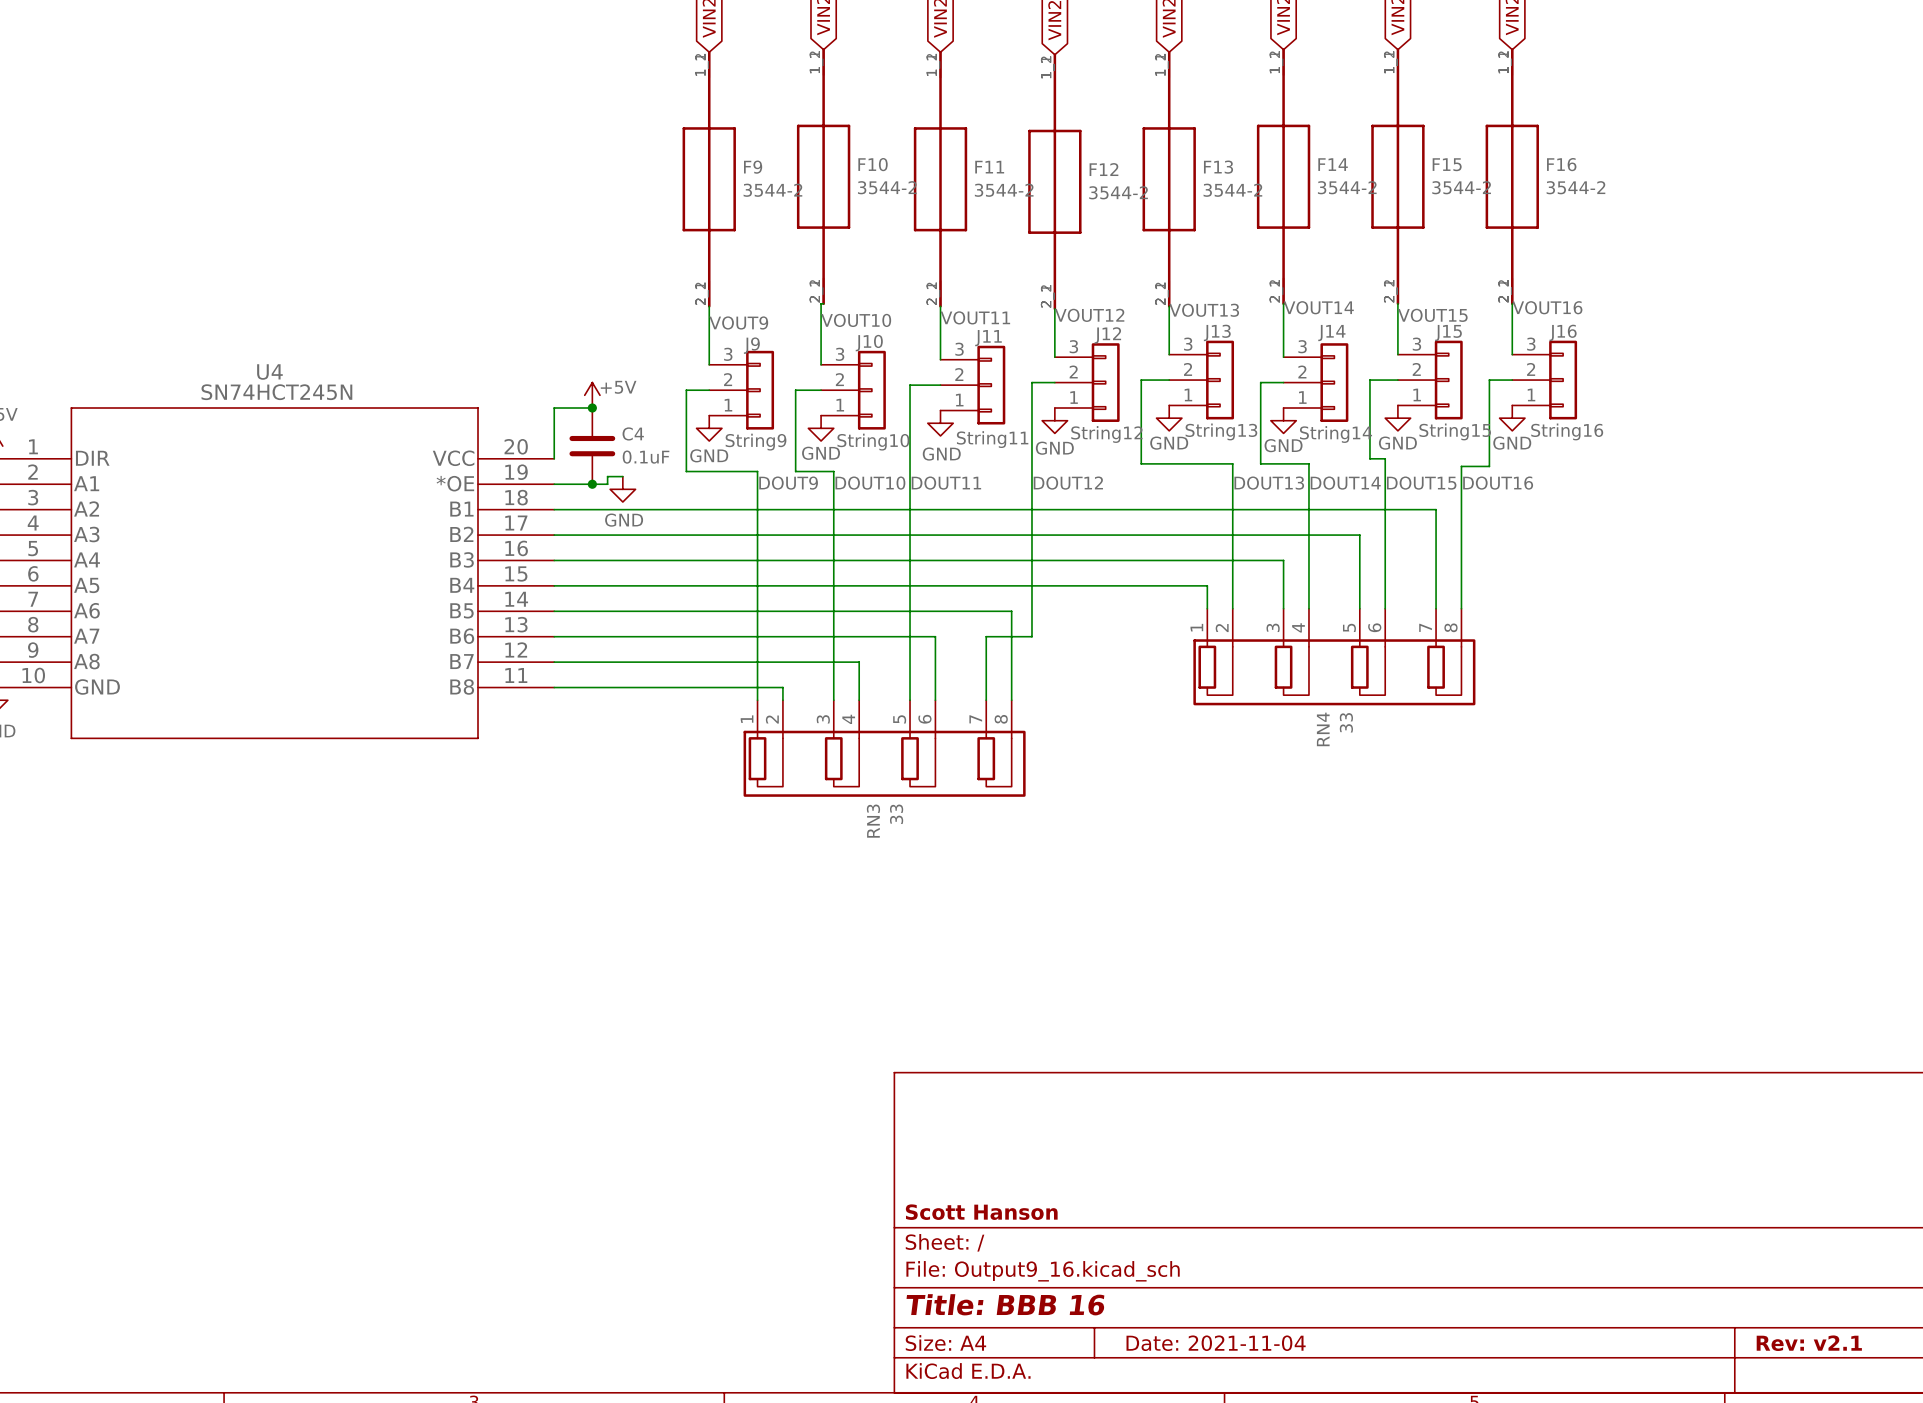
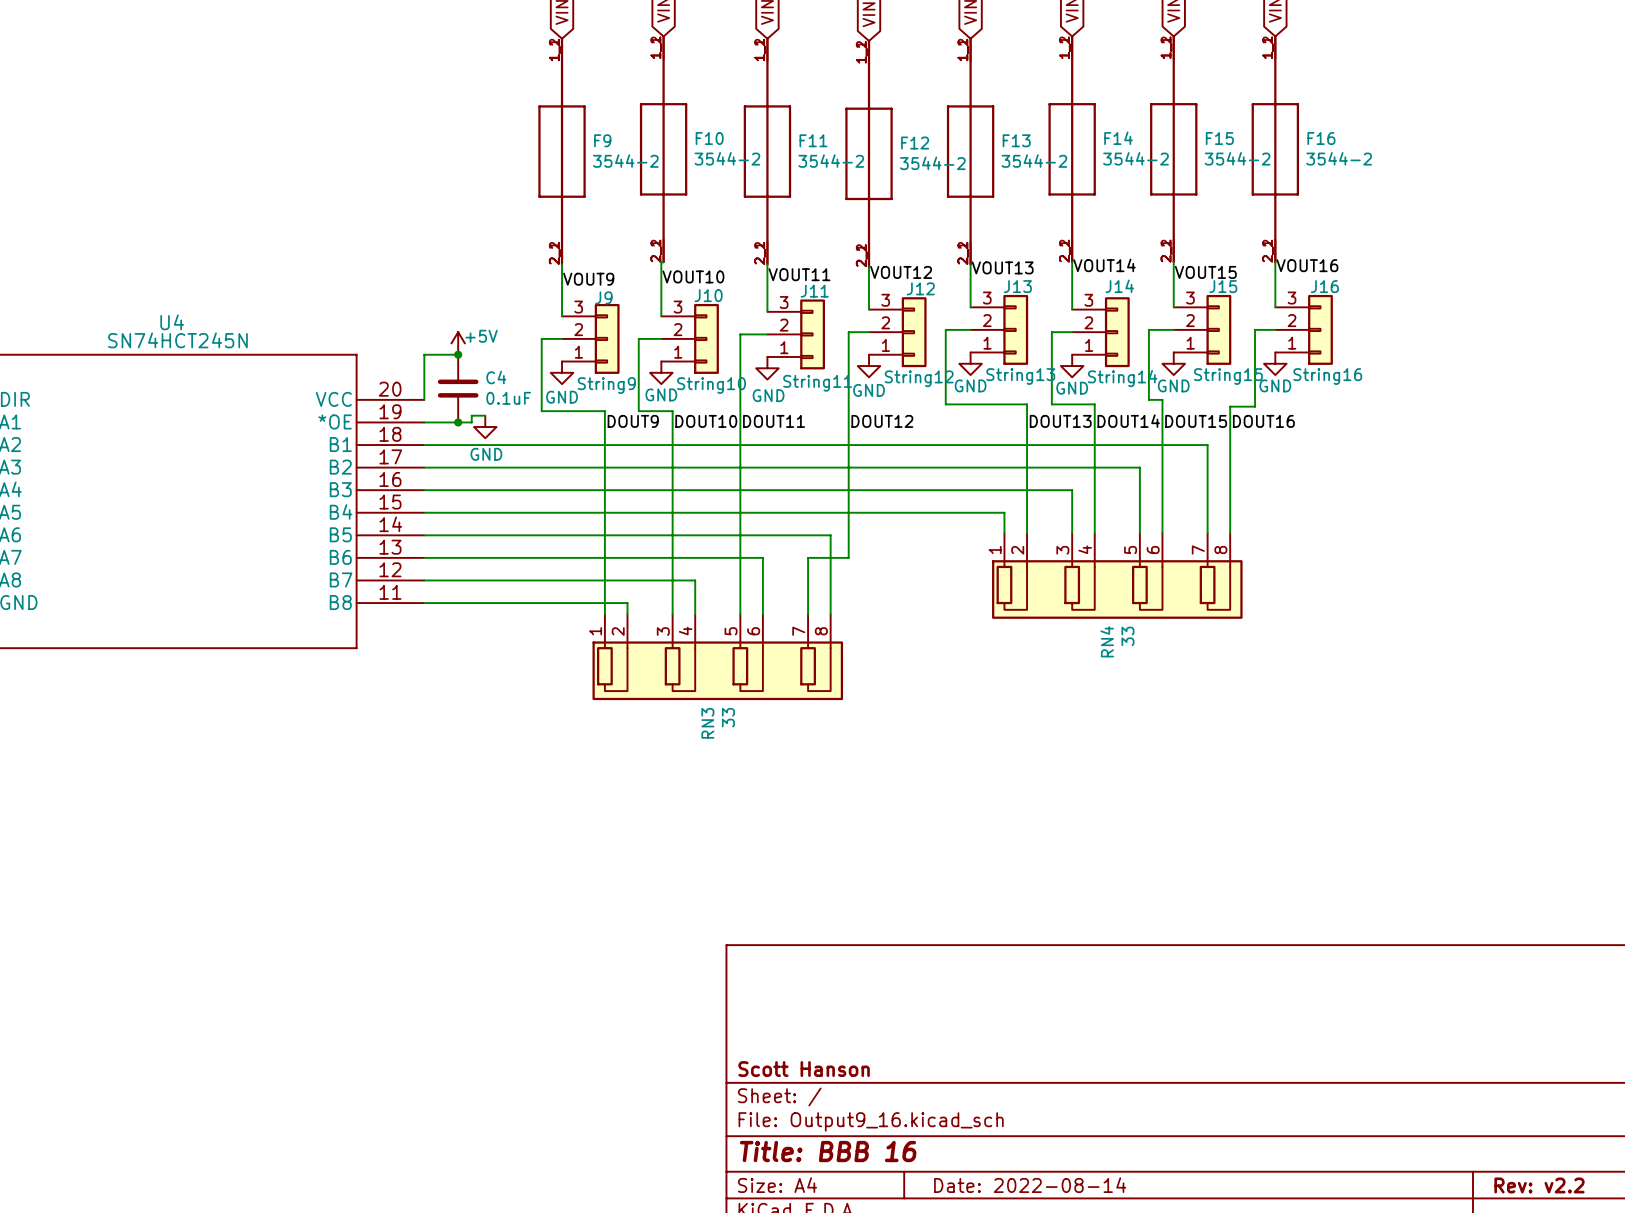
title block: Date: 2021-11-04 (1216, 1343) -> Date: 2022-08-14 (1030, 1185)
title block: Rev: v2.1 (1809, 1343) -> Rev: v2.2 (1539, 1185)

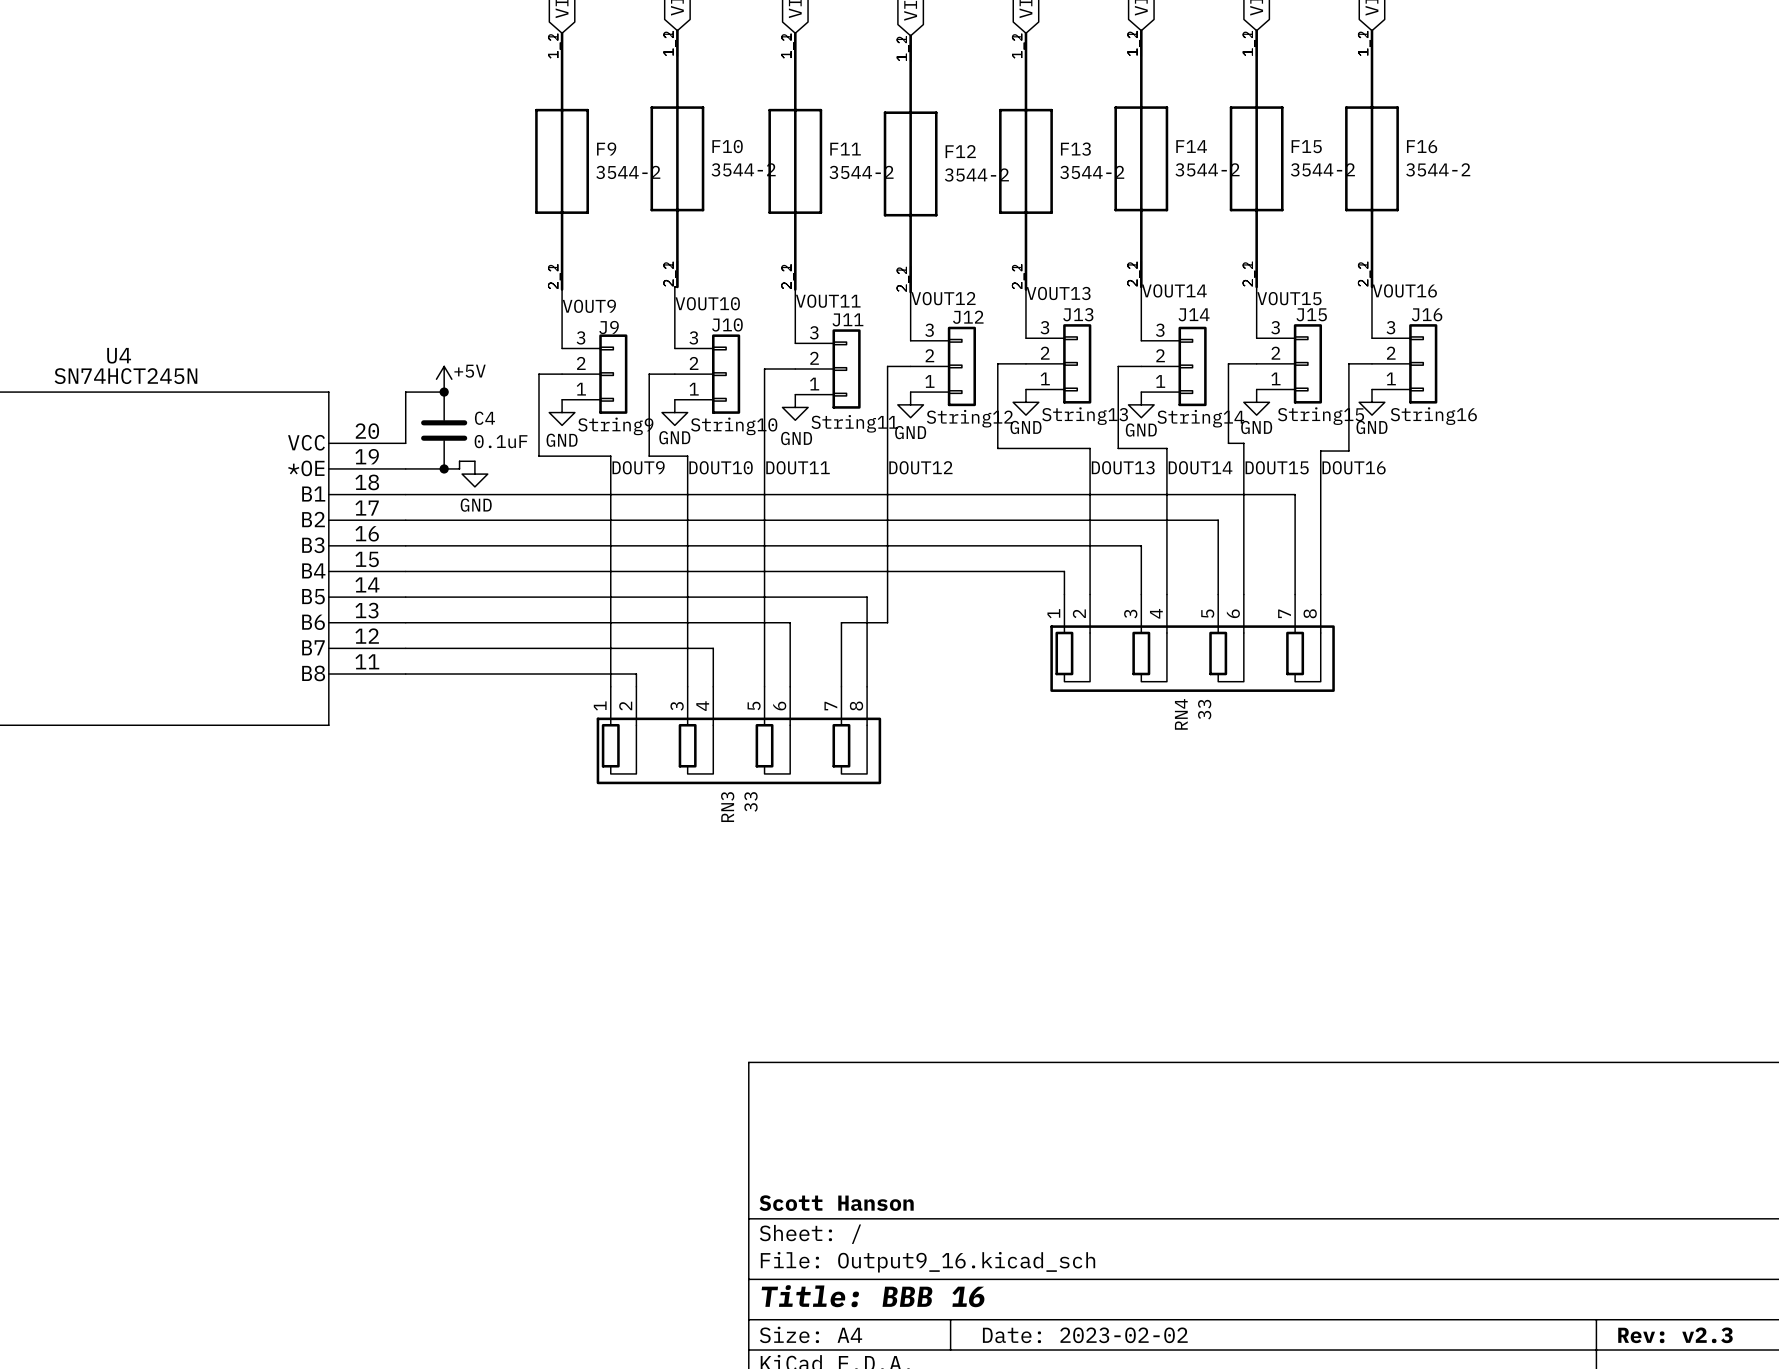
title block: Date: 2022-08-14 (1030, 1185) -> Date: 2023-02-02 (1085, 1335)
title block: Rev: v2.2 (1539, 1185) -> Rev: v2.3 (1675, 1335)

